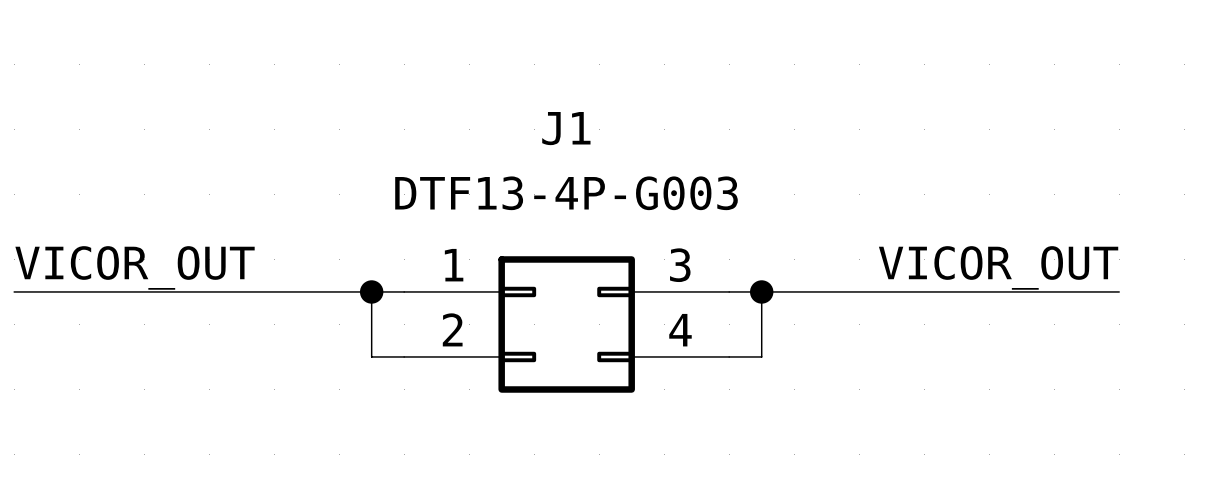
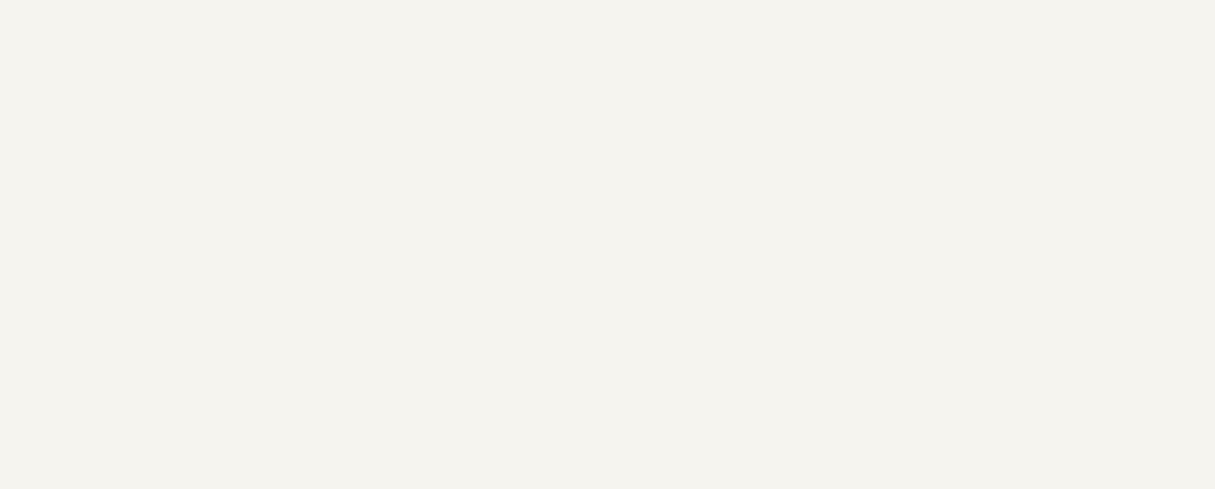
label: VICOR_OUT (135, 267) -> none
label: VICOR_OUT (998, 267) -> none
wire: (14, 291) (404, 291) -> none
wire: (371, 291) (371, 356) (404, 356) -> none
junction: (371, 291) -> none
wire: (729, 291) (1119, 291) -> none
wire: (761, 291) (761, 356) (729, 356) -> none
junction: (761, 291) -> none
J1: DTF13-4P-G003 (566, 324) -> none

